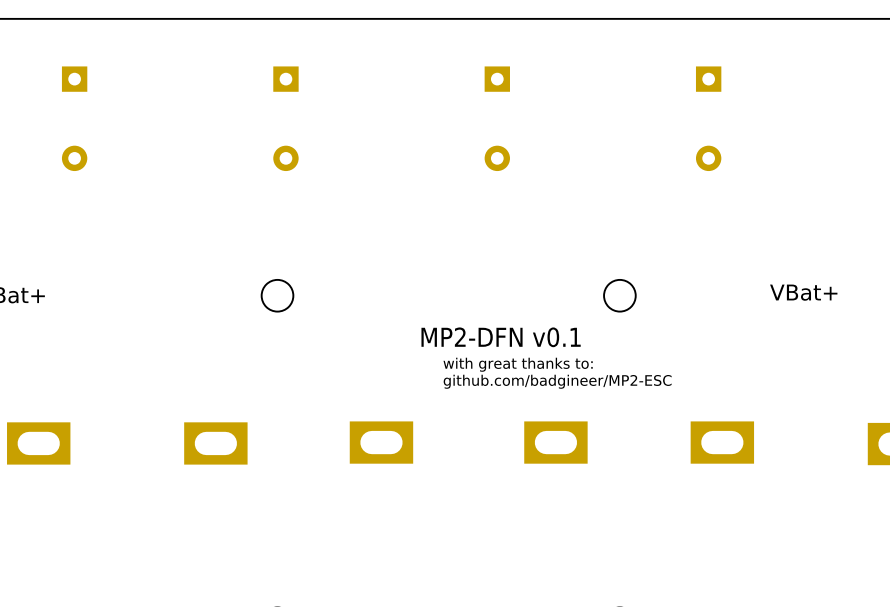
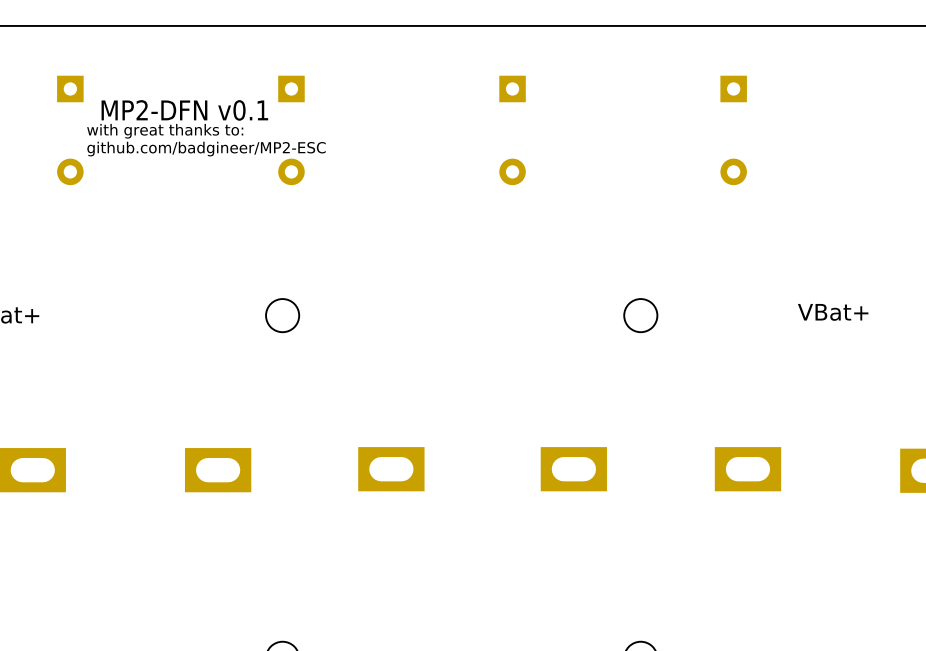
text: none -> MP2-DFN v0.1 (184, 110)
text: none -> with great thanks to: (165, 131)
text: none -> github.com/badgineer/MP2-ESC (206, 149)
text: MP2-DFN v0.1 (501, 337) -> none
text: with great thanks to: (518, 364) -> none
text: github.com/badgineer/MP2-ESC (557, 381) -> none

